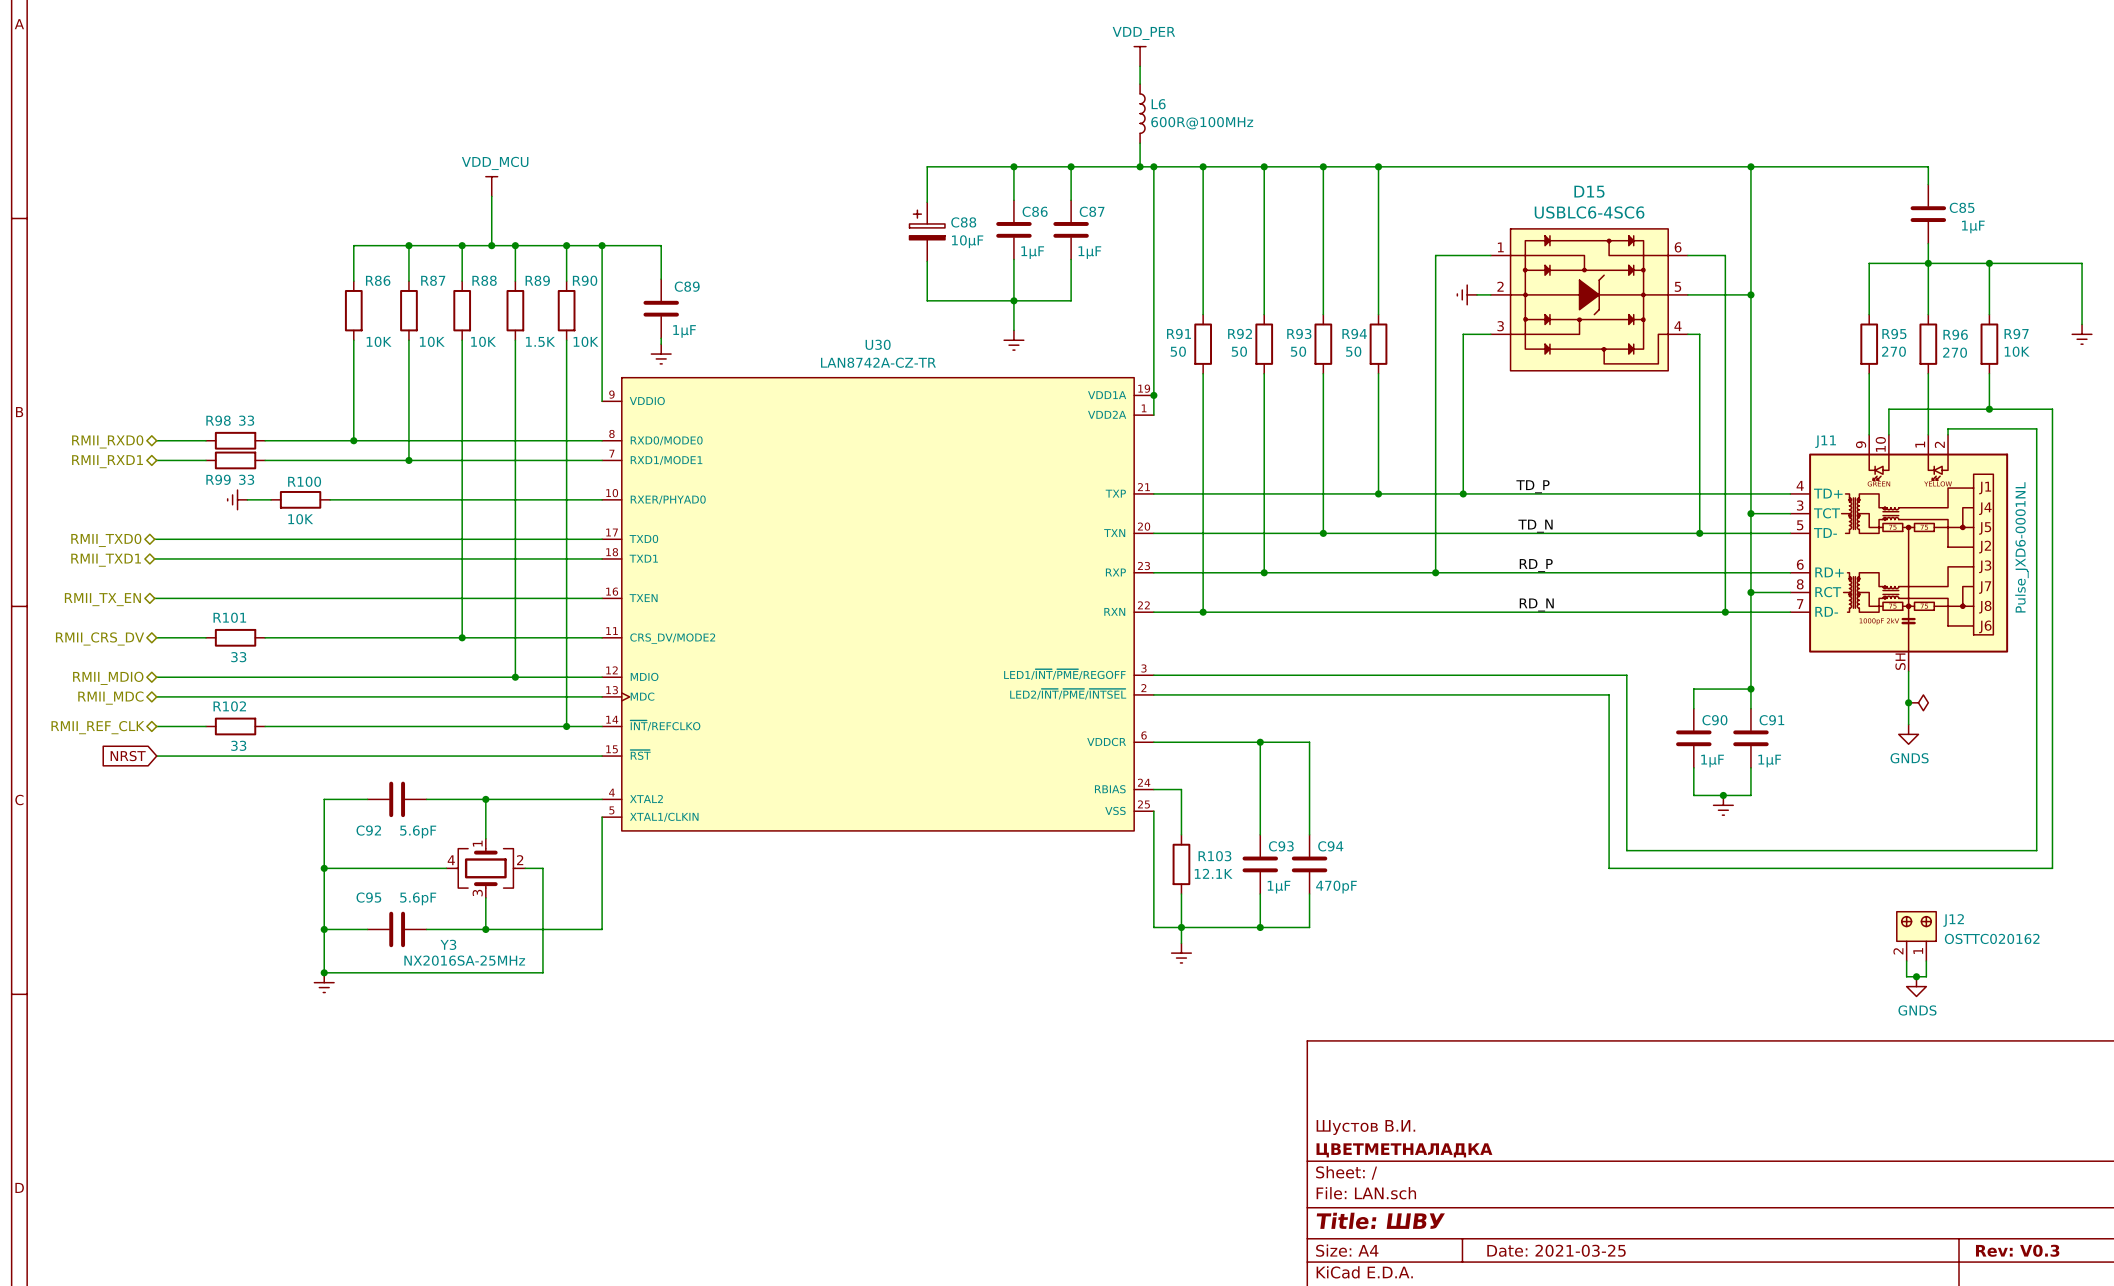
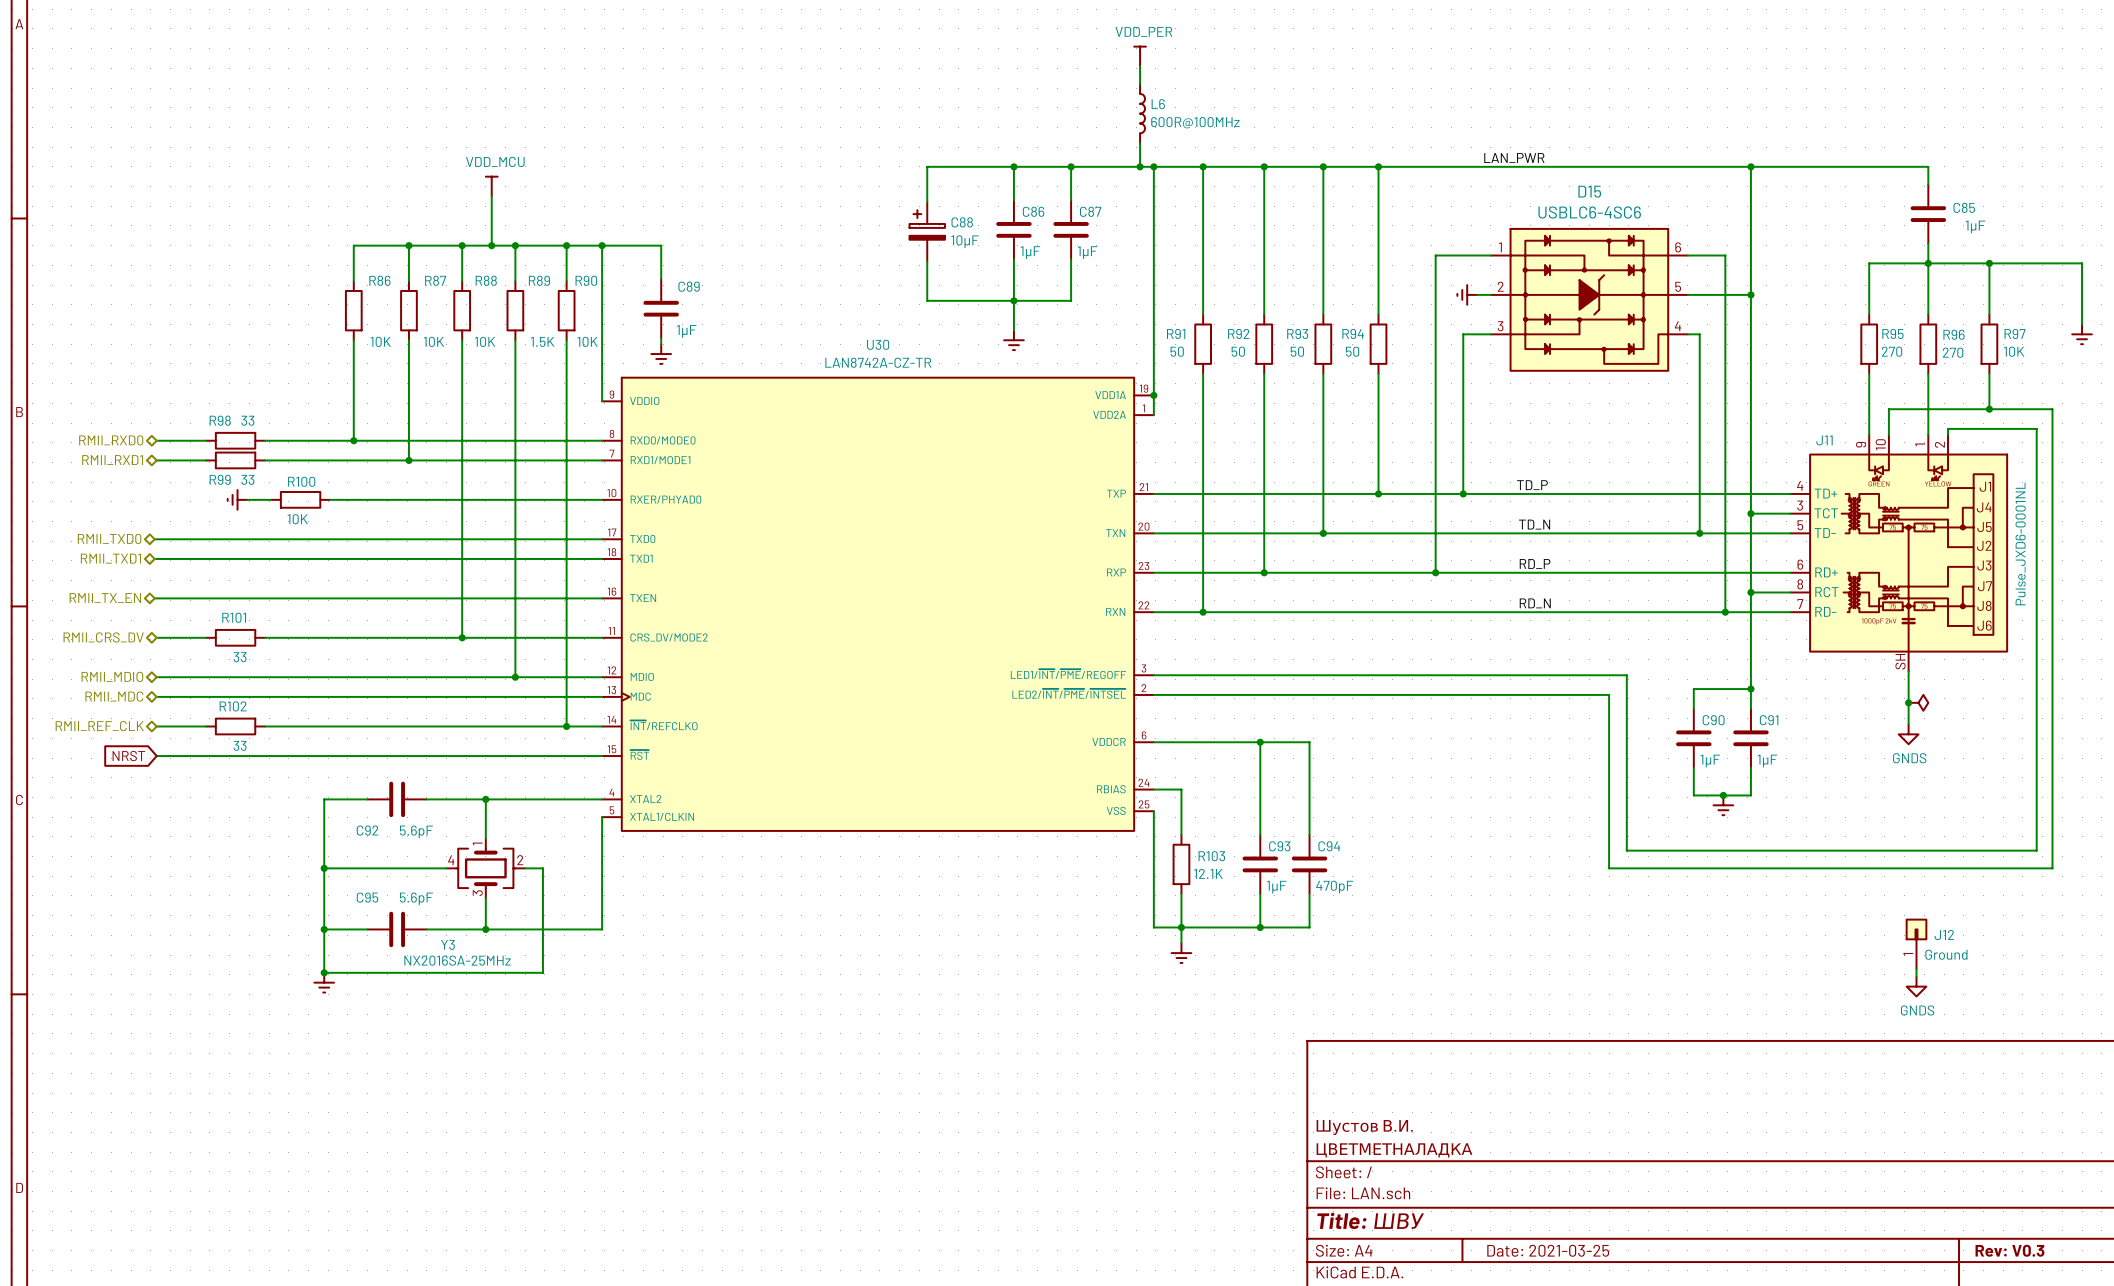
label: none -> LAN_PWR (1514, 158)
J12 symbol: [1896, 911, 1937, 961] -> [1905, 918, 1928, 969]
J12 value: OSTTC020162 (1992, 938) -> Ground (1946, 954)
wire: (1906, 960) (1906, 976) (1926, 976) (1926, 960) -> none
wire: none -> (1916, 968) (1916, 976)
junction: (1916, 976) -> none

